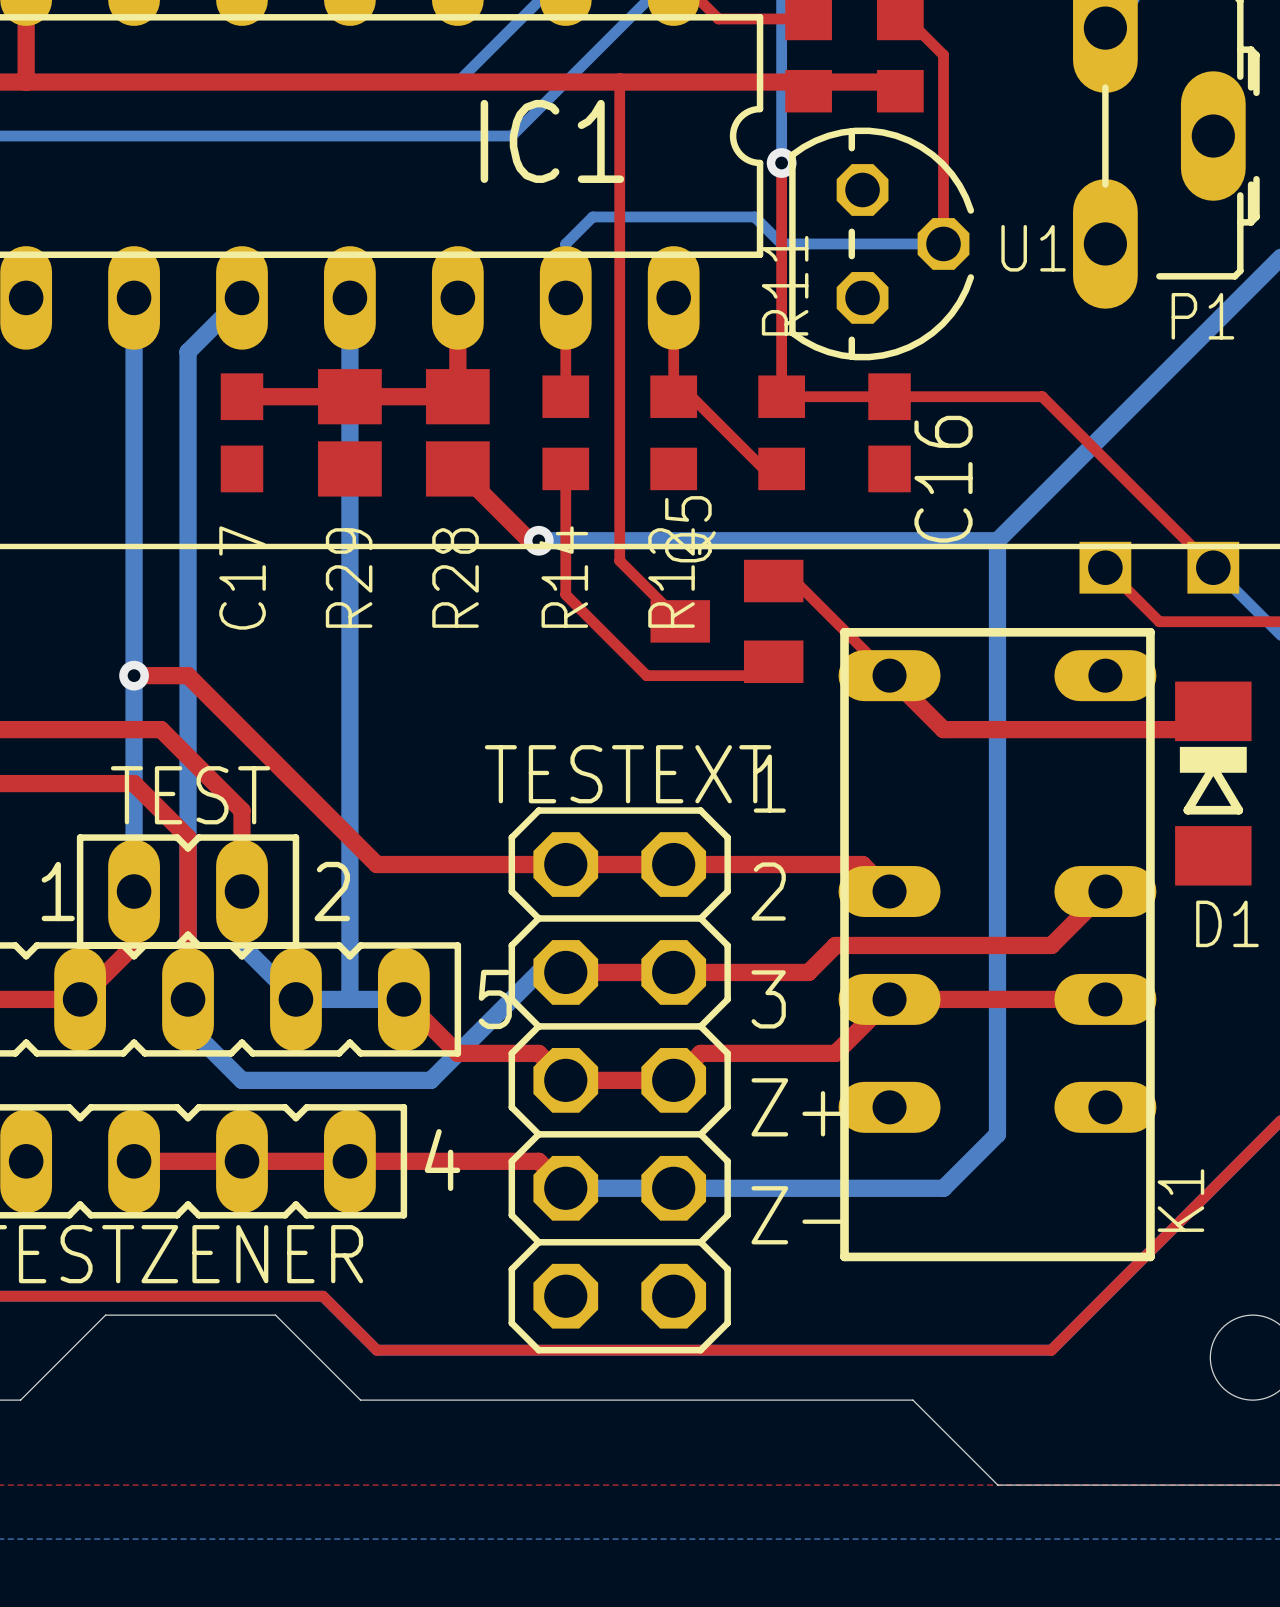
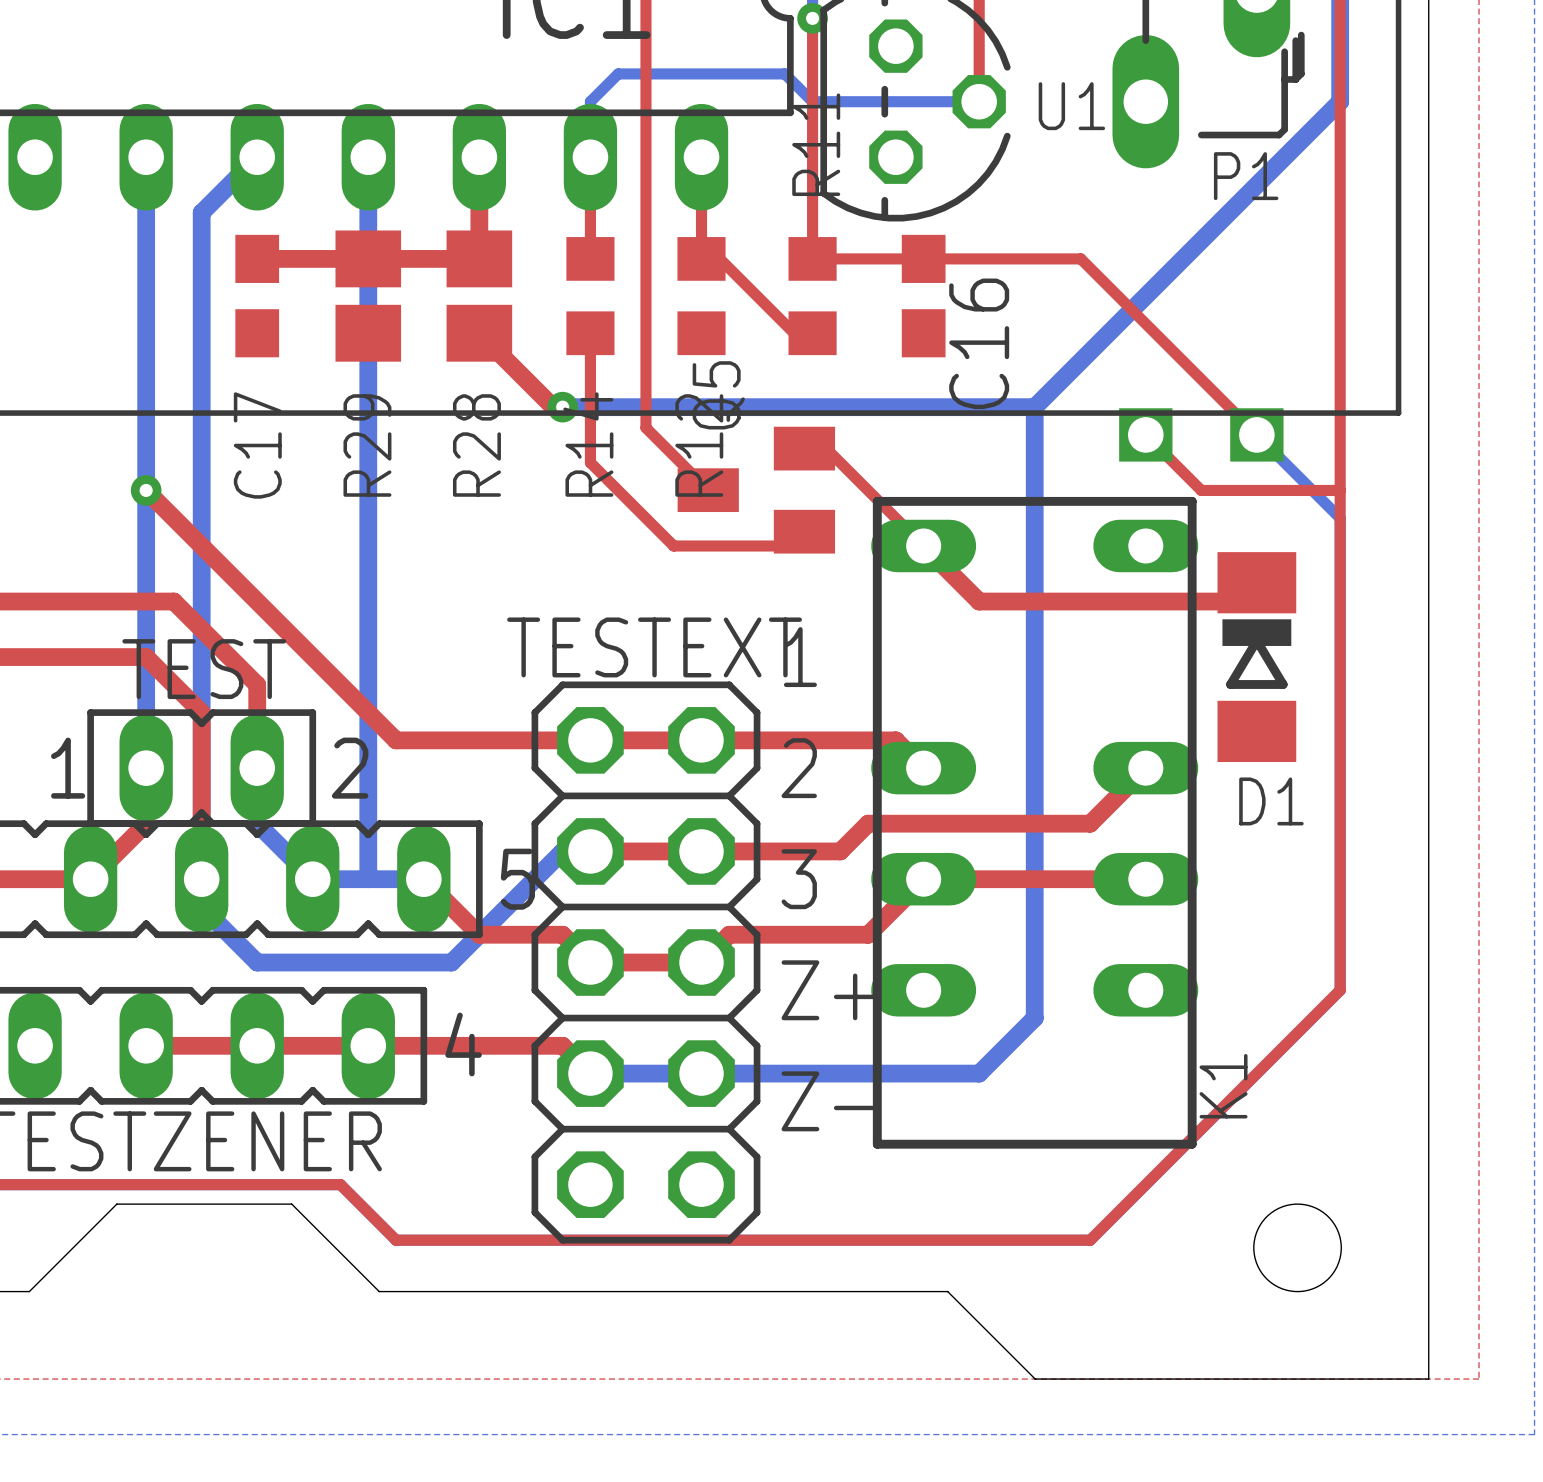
top track: (134, 675) (188, 675) -> (146, 490) (201, 545)
via position: (134, 675) -> (146, 490)

